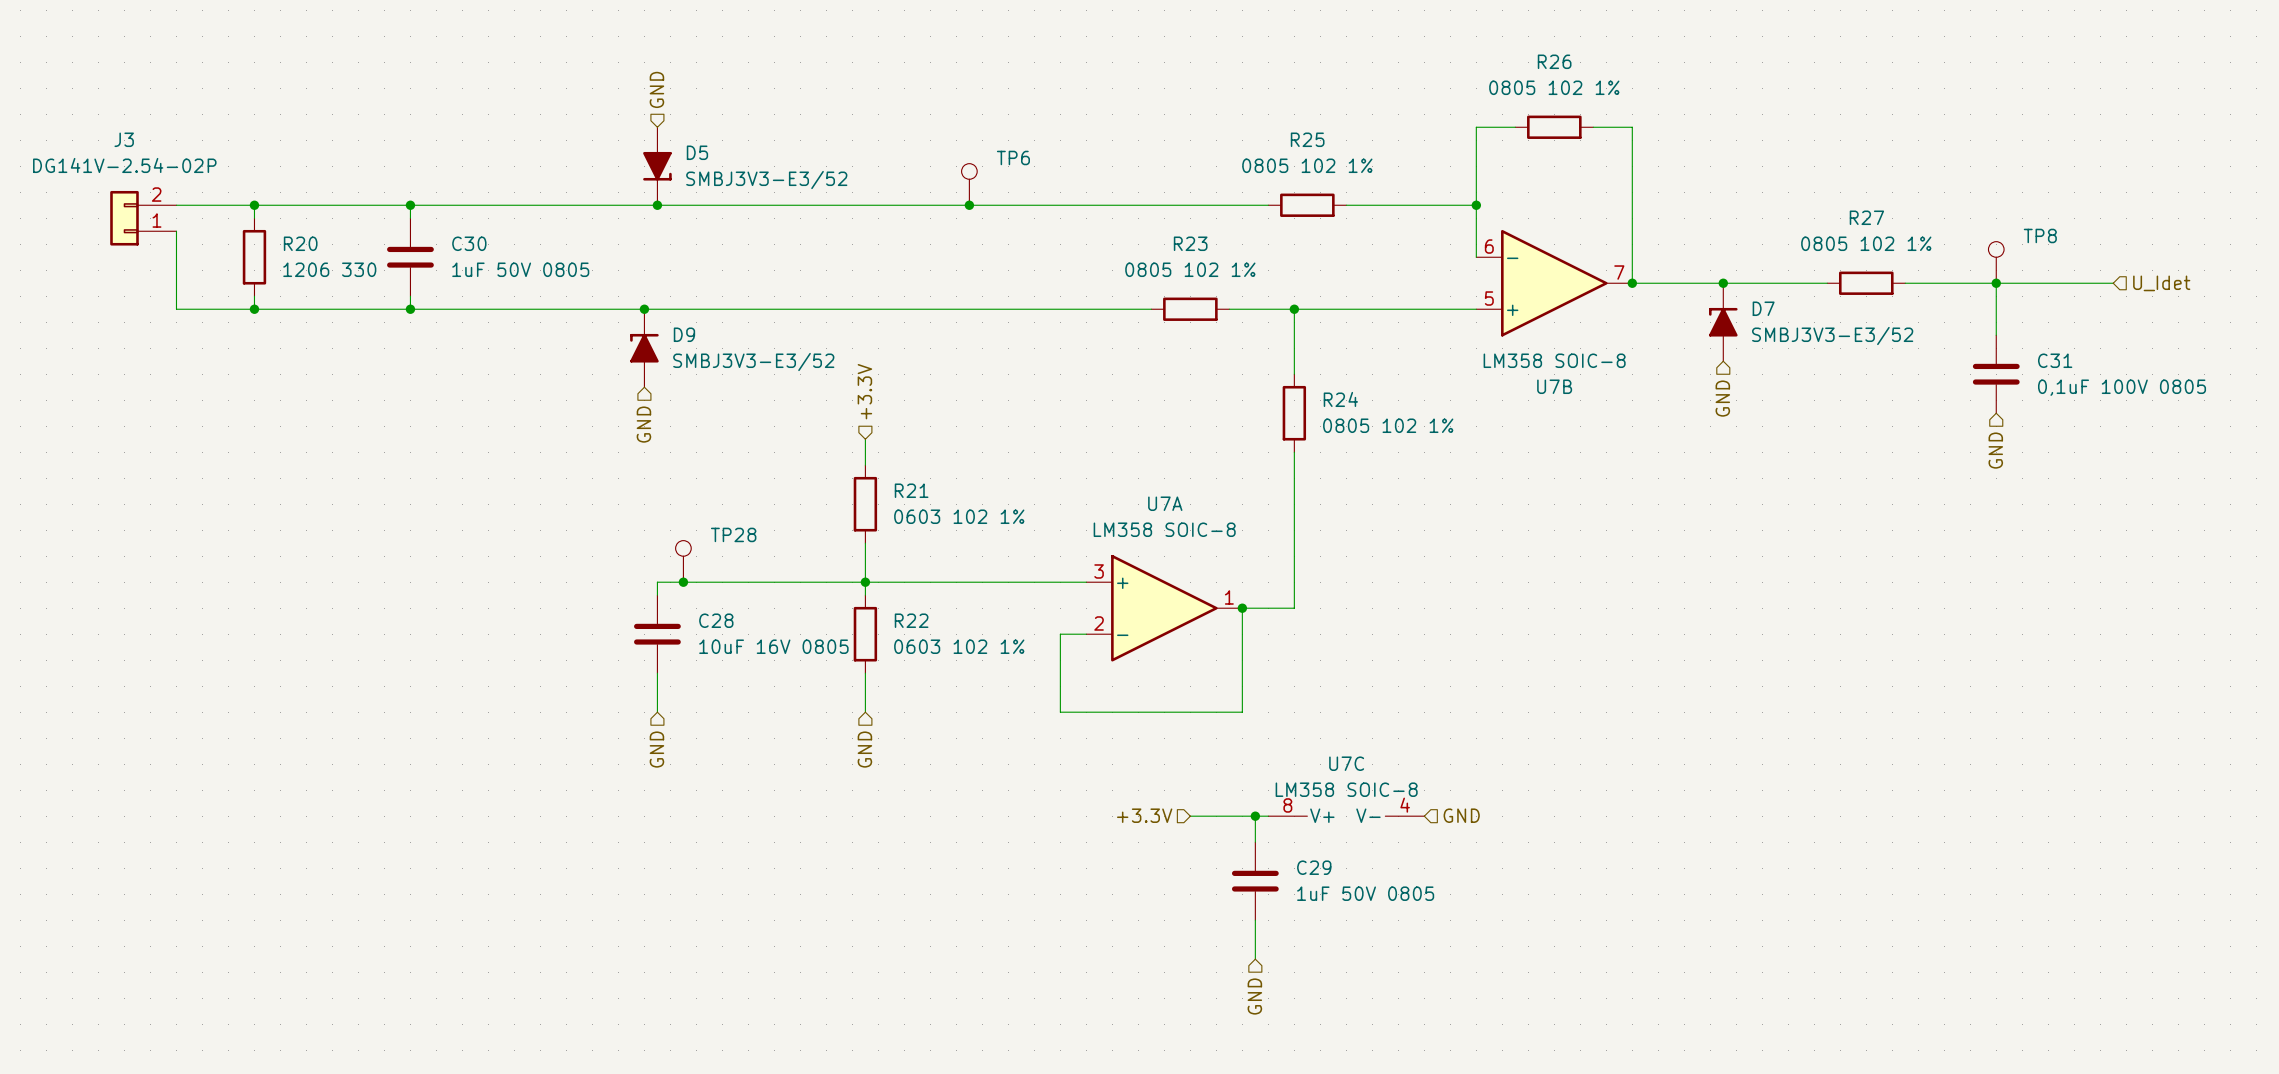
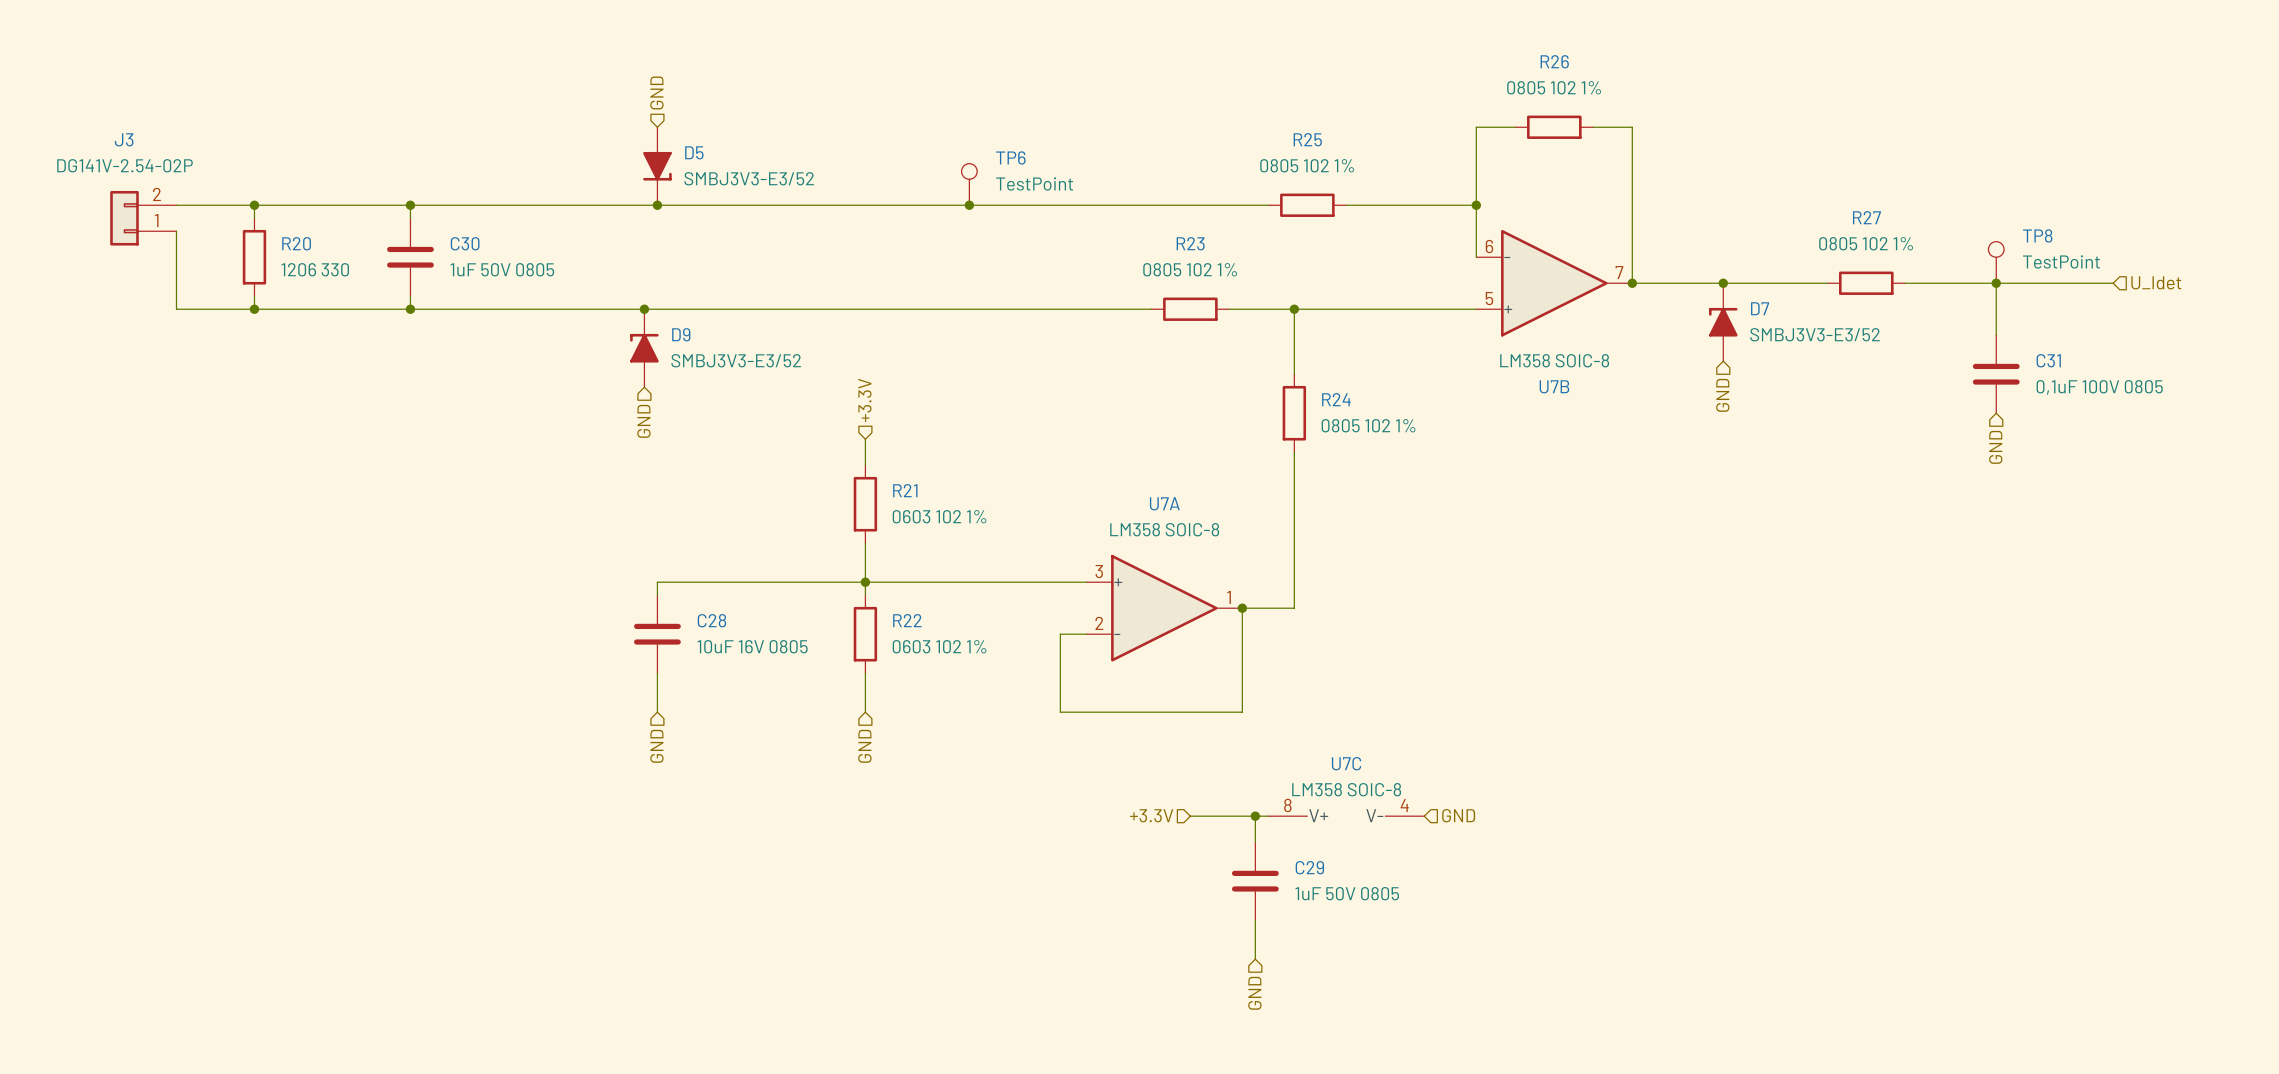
TP6 value: none -> TestPoint (1034, 183)
TP8 value: none -> TestPoint (2061, 261)
TP28: (683, 561) -> none
junction: (683, 582) -> none

